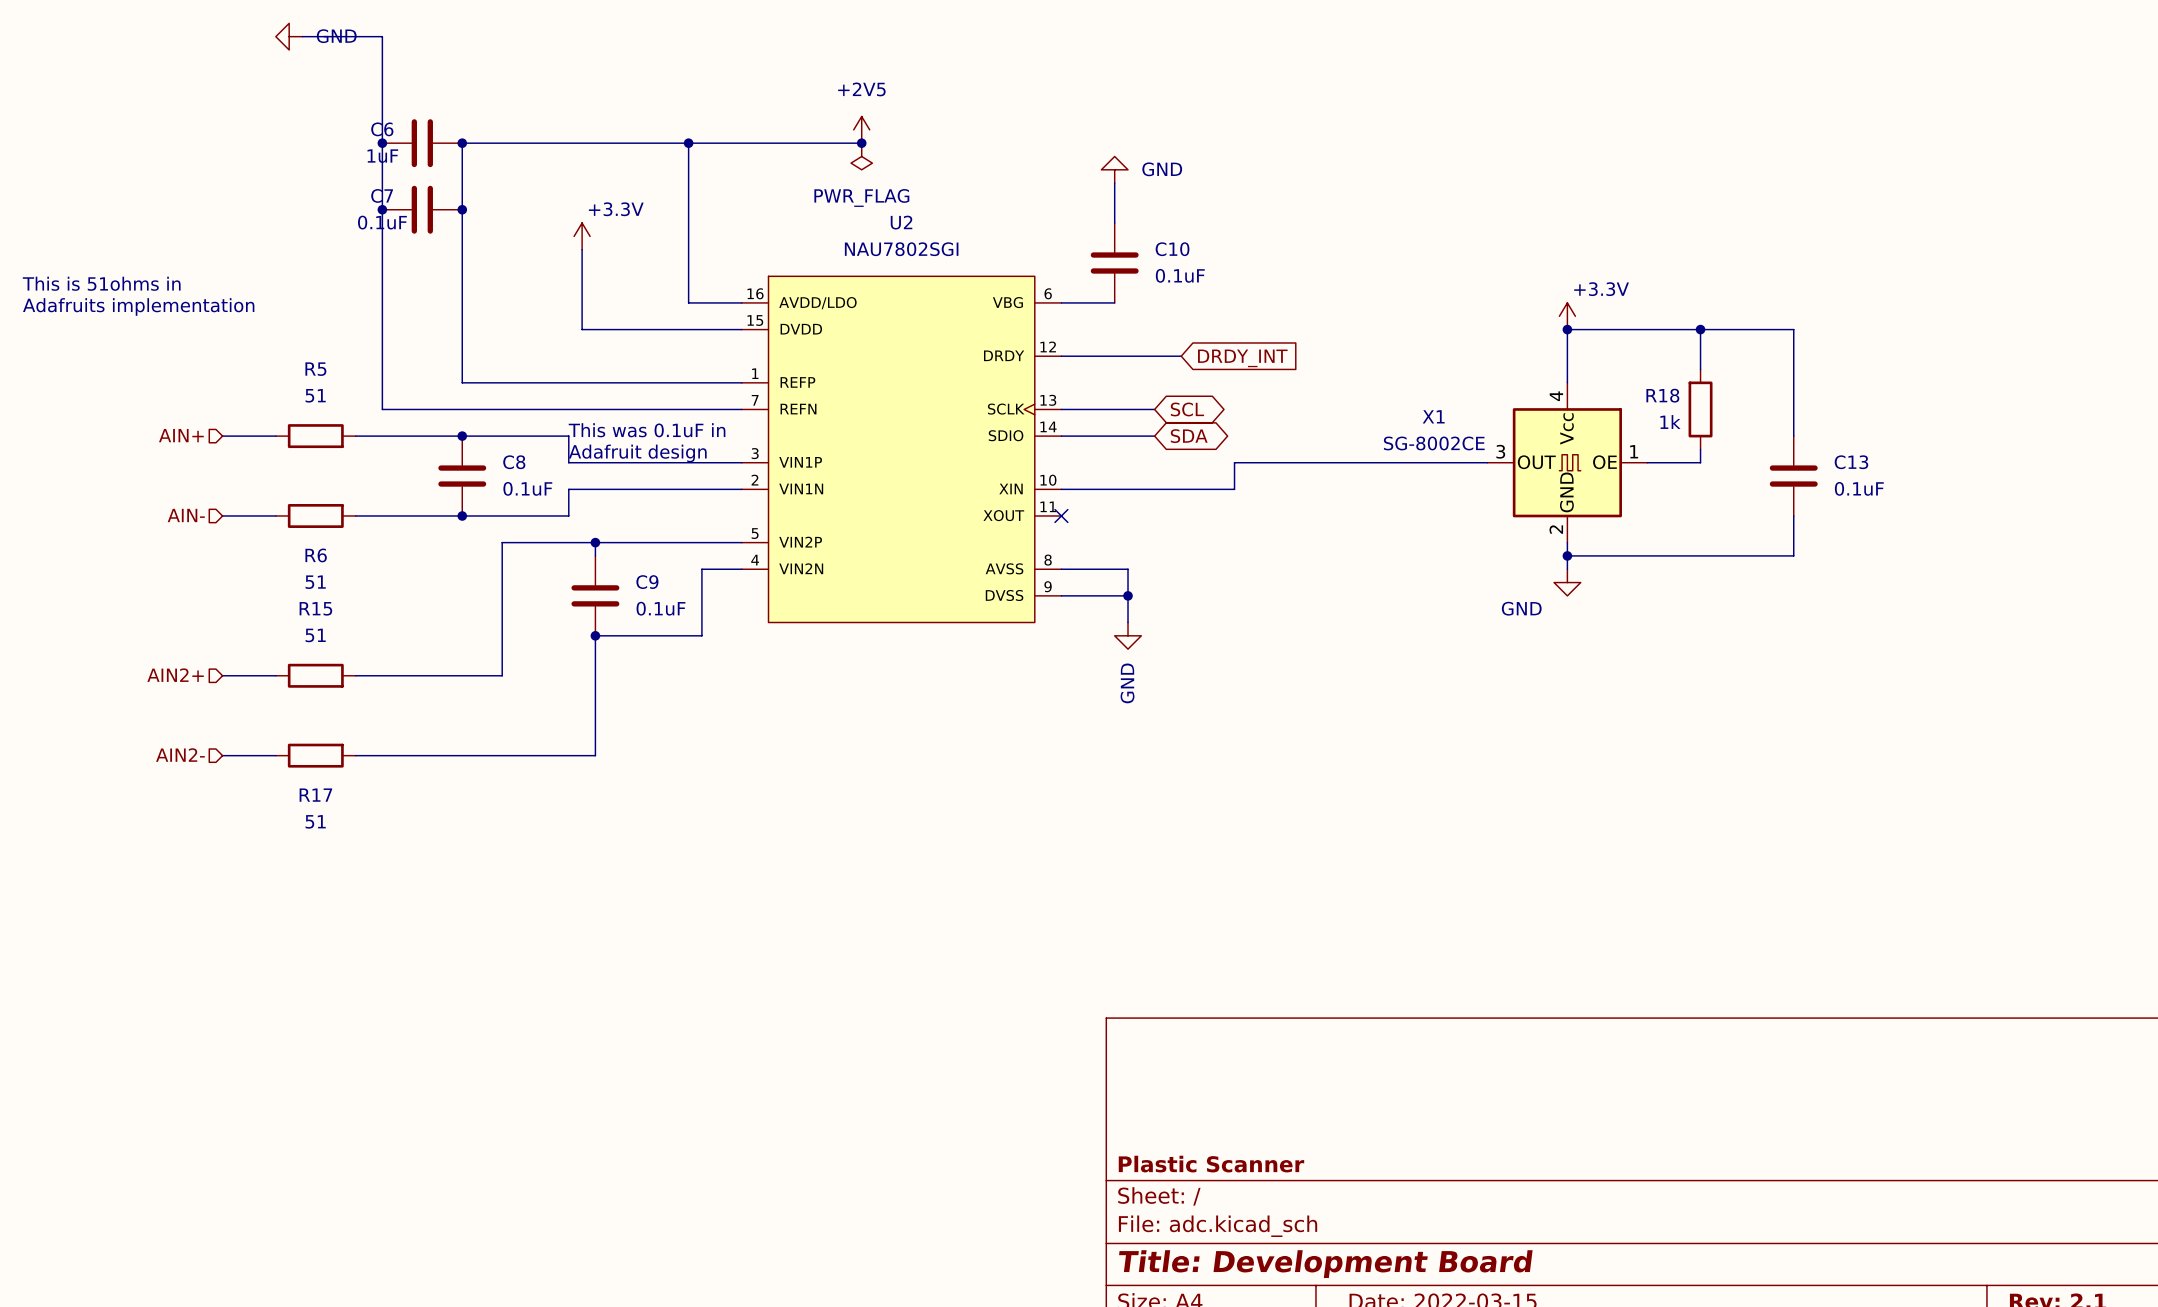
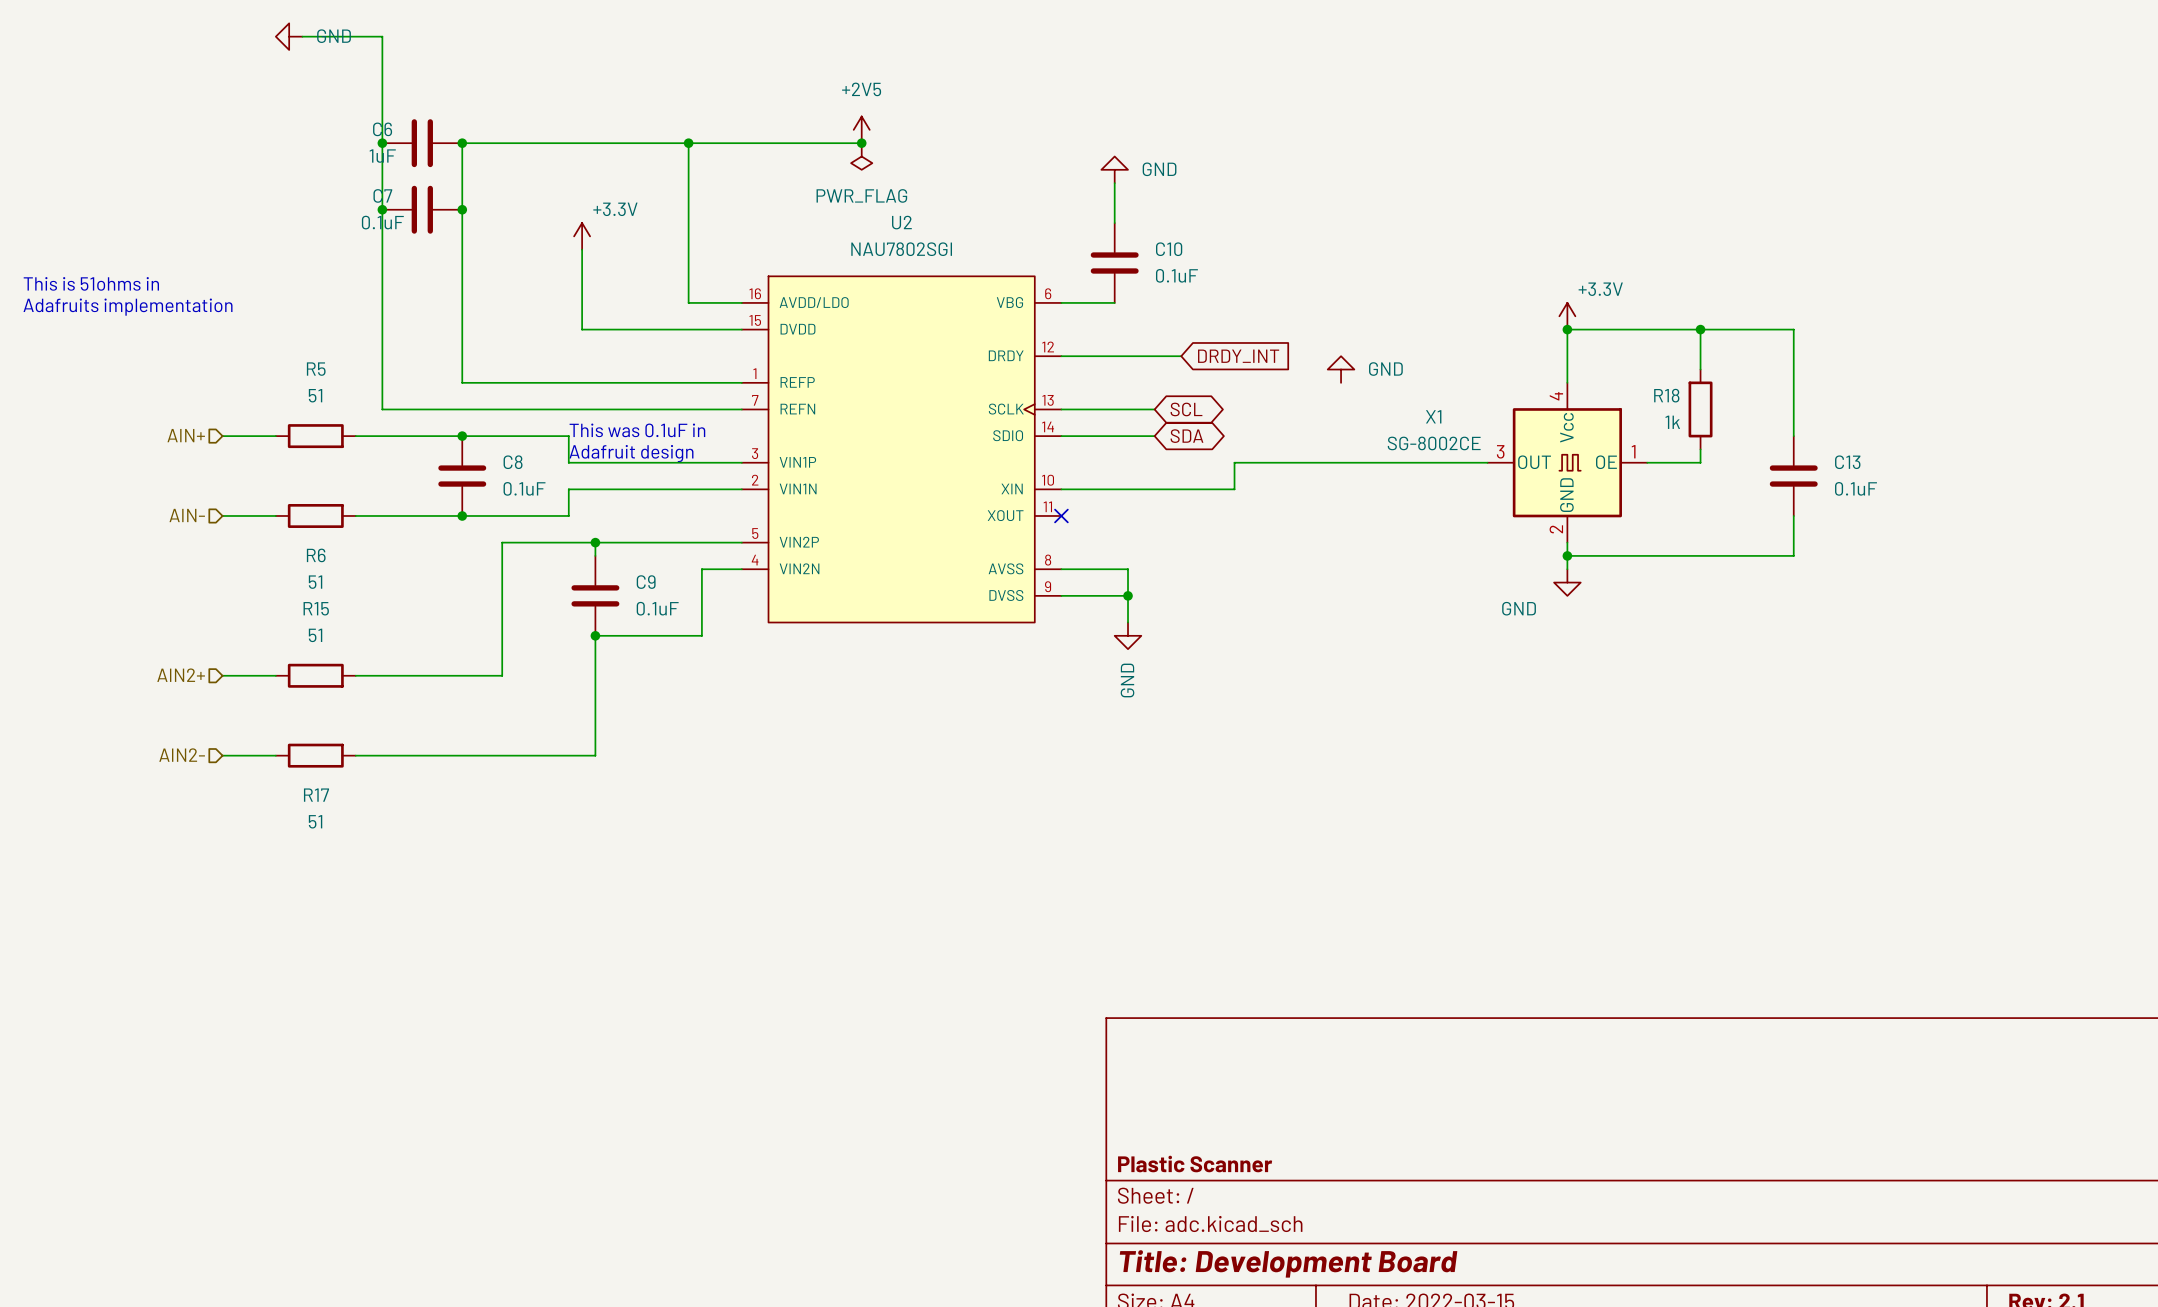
power symbol: none -> GND (1341, 369)

